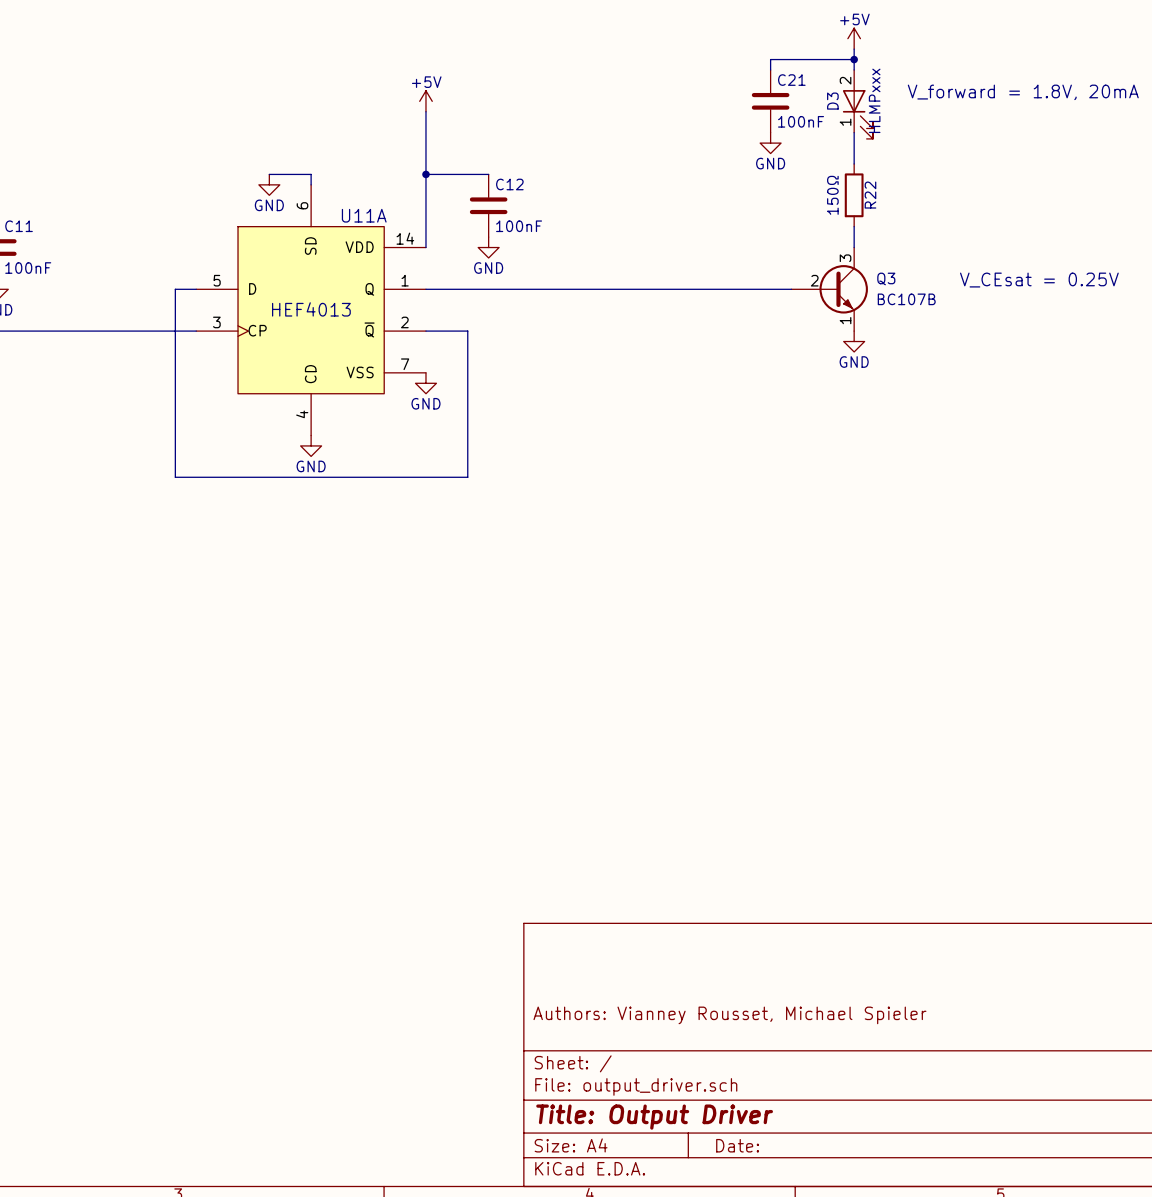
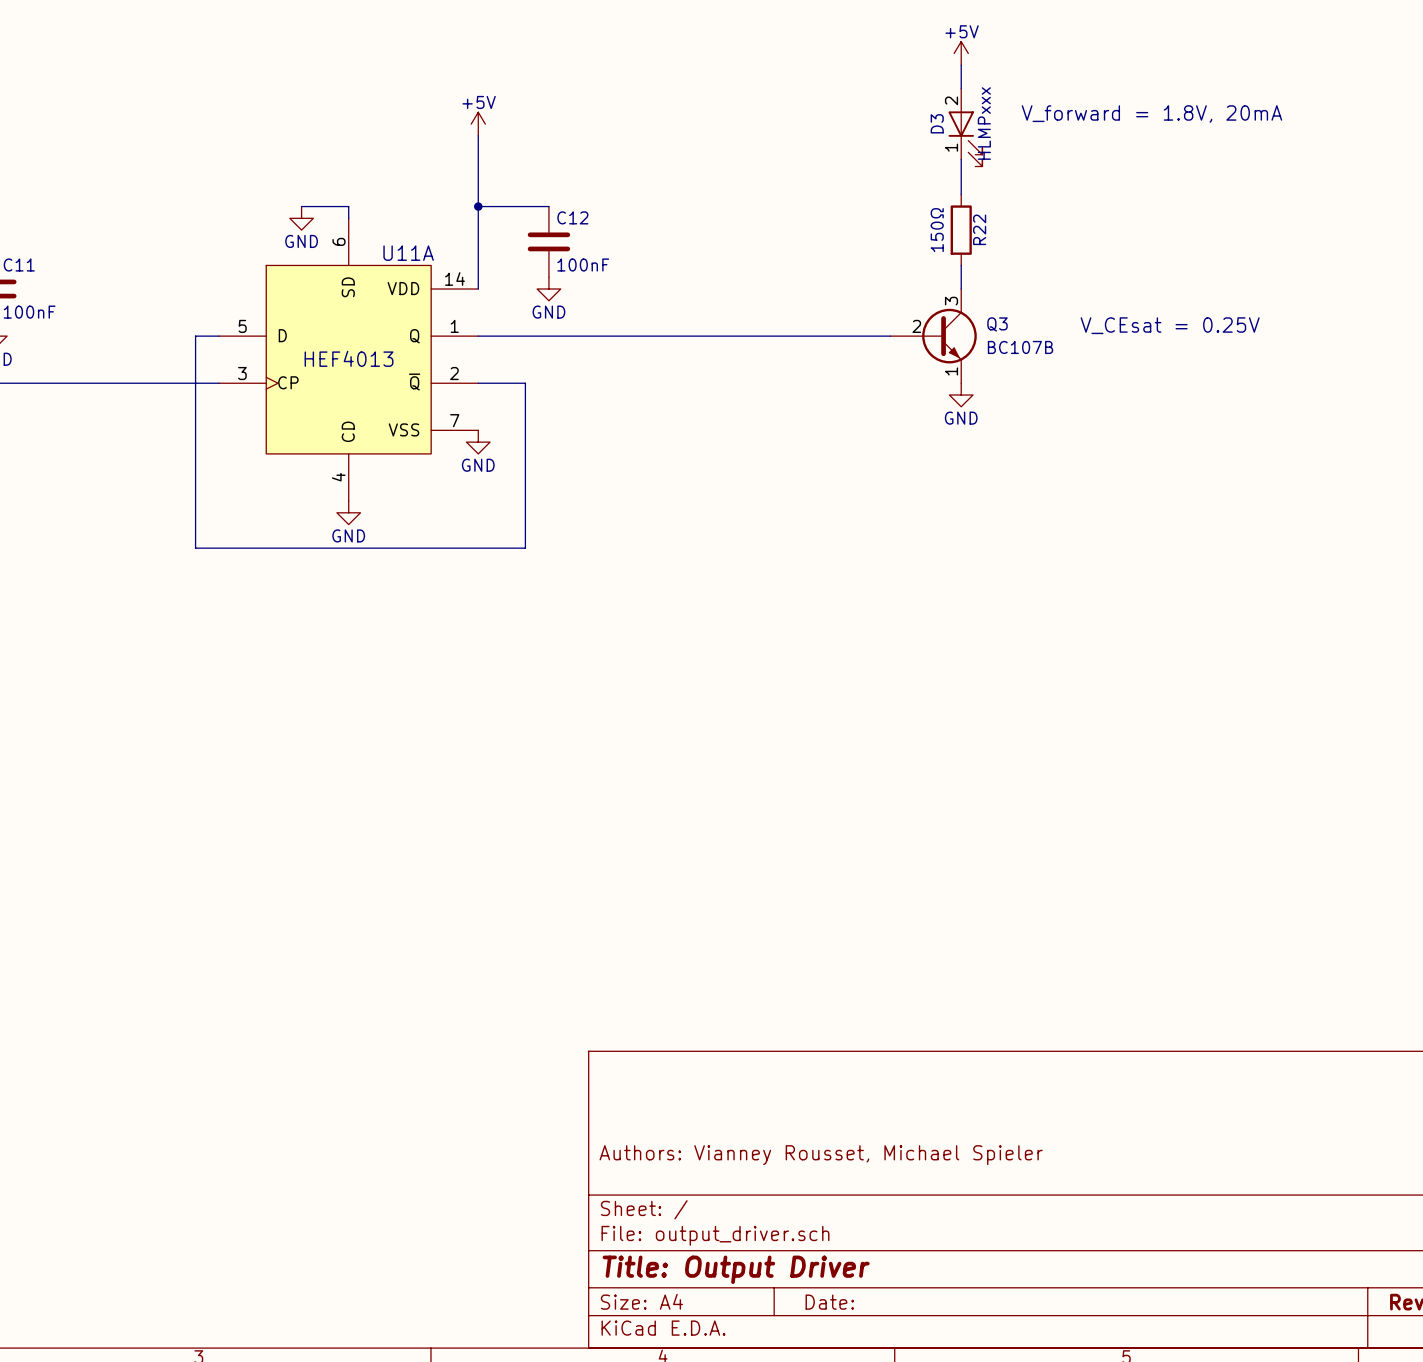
wire: (854, 59) (770, 59) (770, 70) -> none
junction: (854, 59) -> none
C21: 100nF (770, 101) -> none
power symbol: GND (770, 143) -> none

